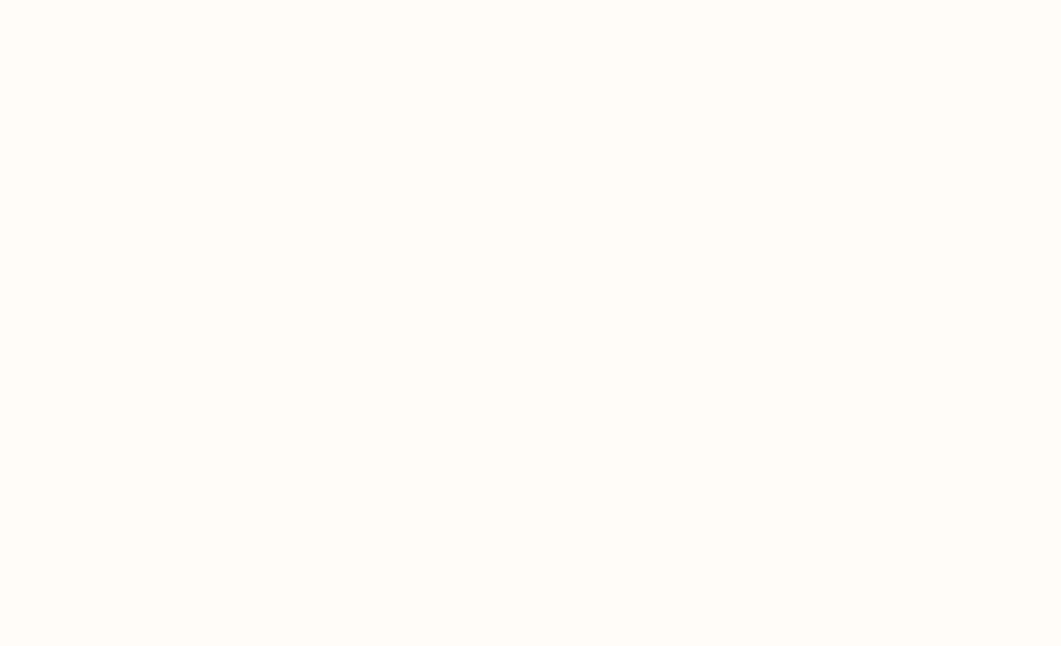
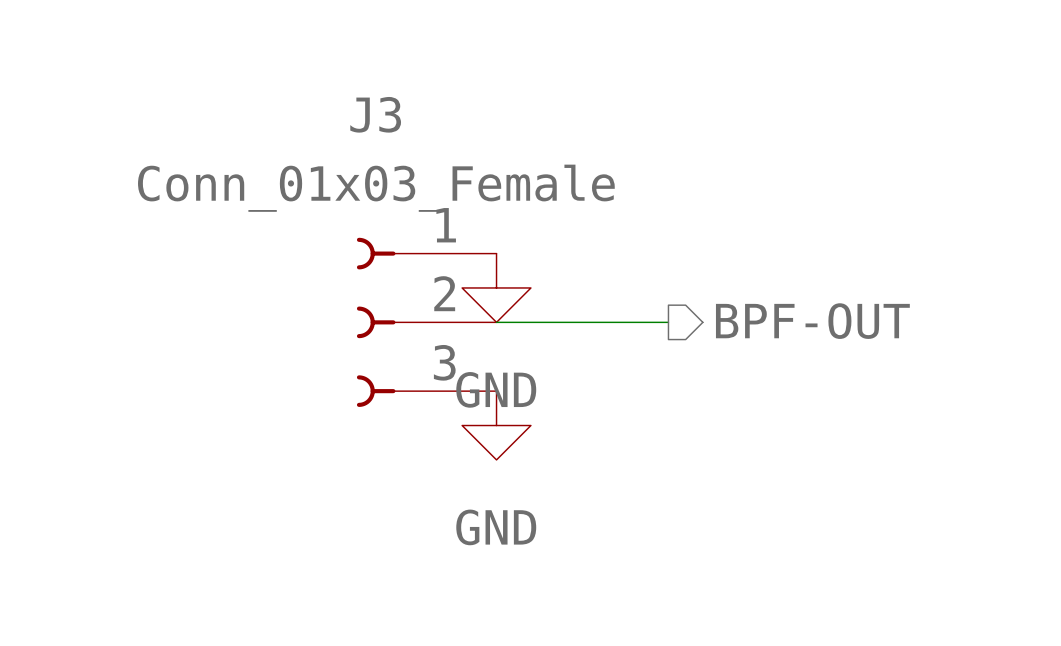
power symbol: none -> GND (496, 287)
hierarchical label: none -> BPF-OUT (812, 321)
J3: none -> Conn_01x03_Female (426, 322)
wire: none -> (496, 322) (668, 322)
power symbol: none -> GND (496, 425)

